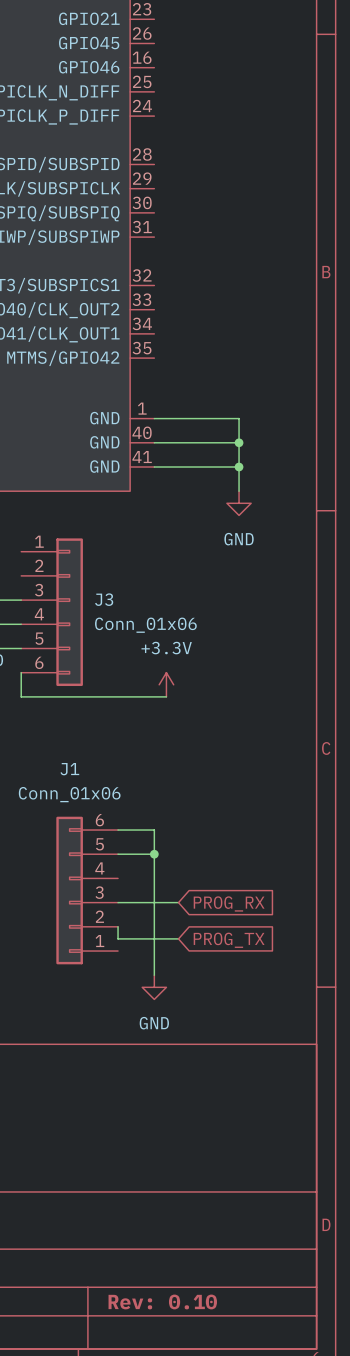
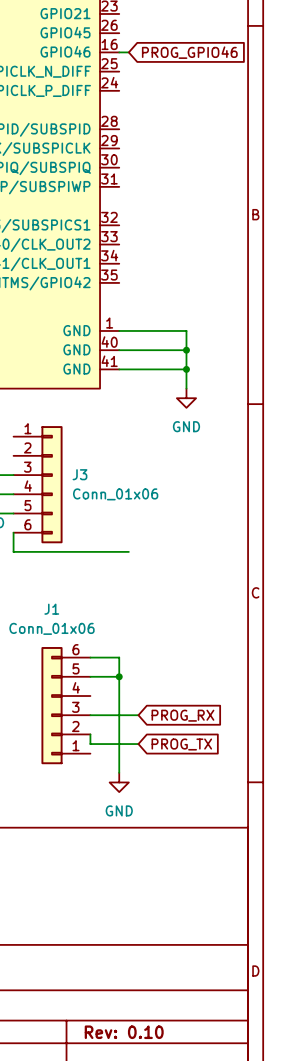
wire: none -> (119, 52) (128, 52)
global label: none -> PROG_GPIO46 (189, 52)
power symbol: +3.3V (166, 684) -> none

